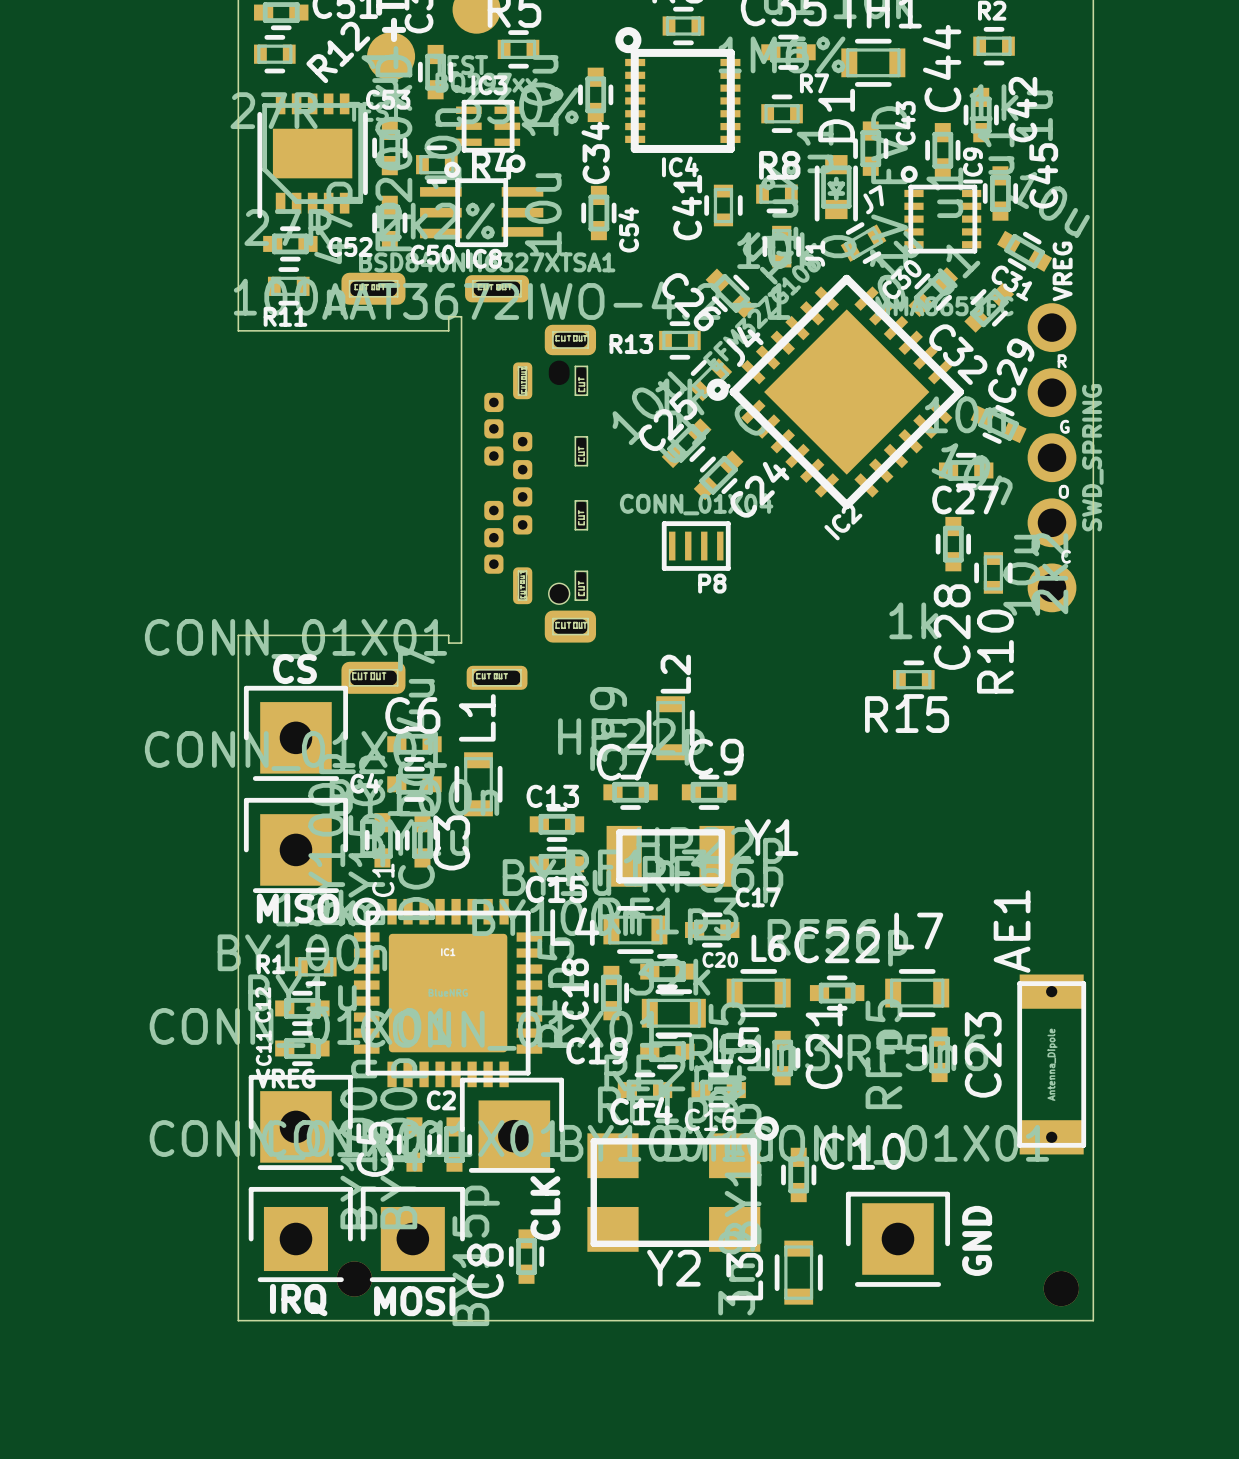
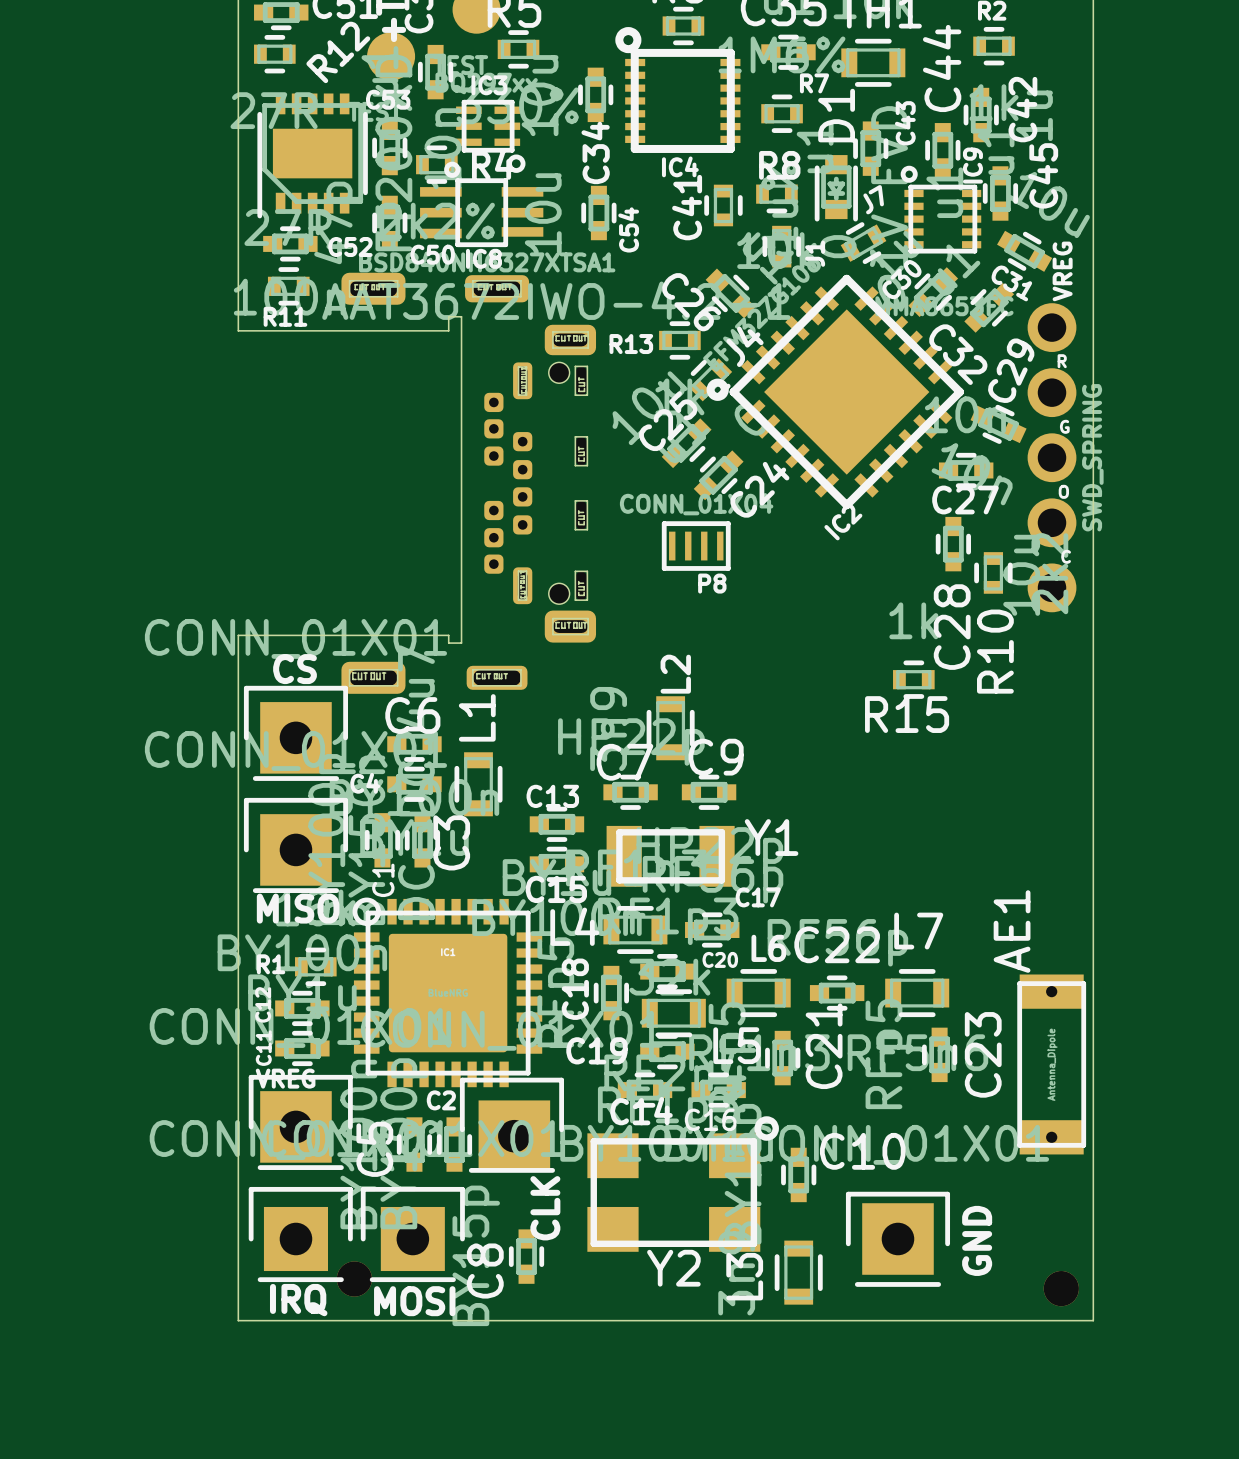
part footprint: [341, 272, 597, 694] -> [341, 272, 597, 694]

